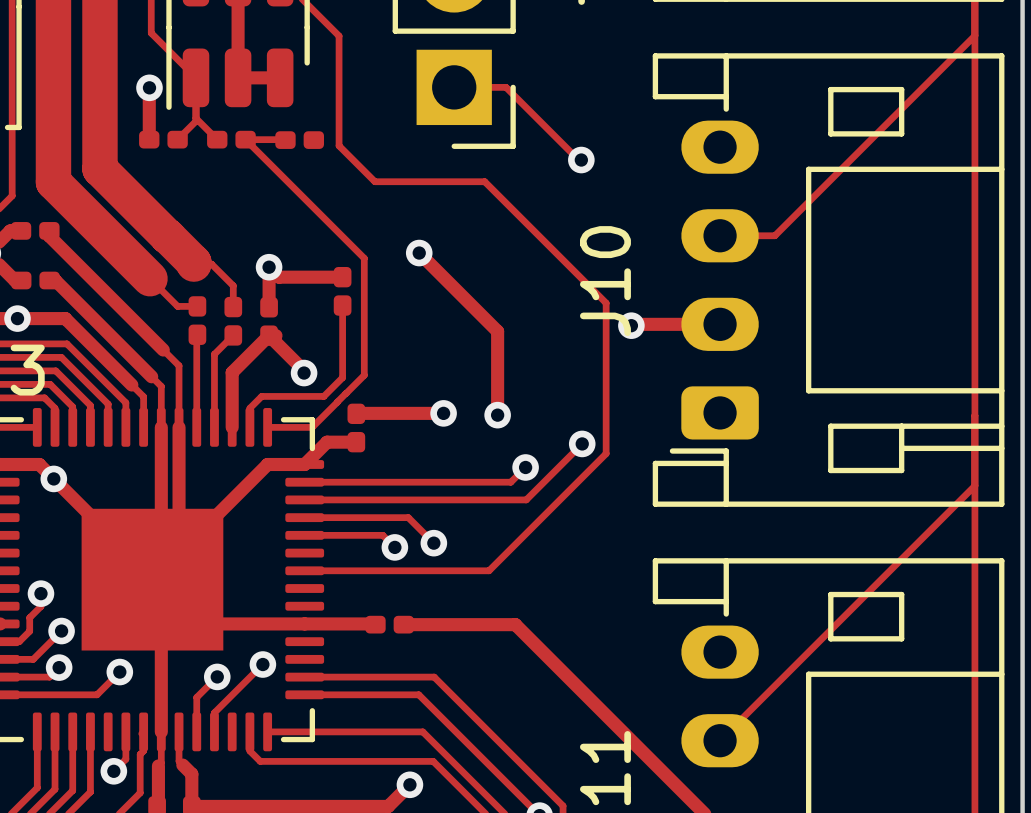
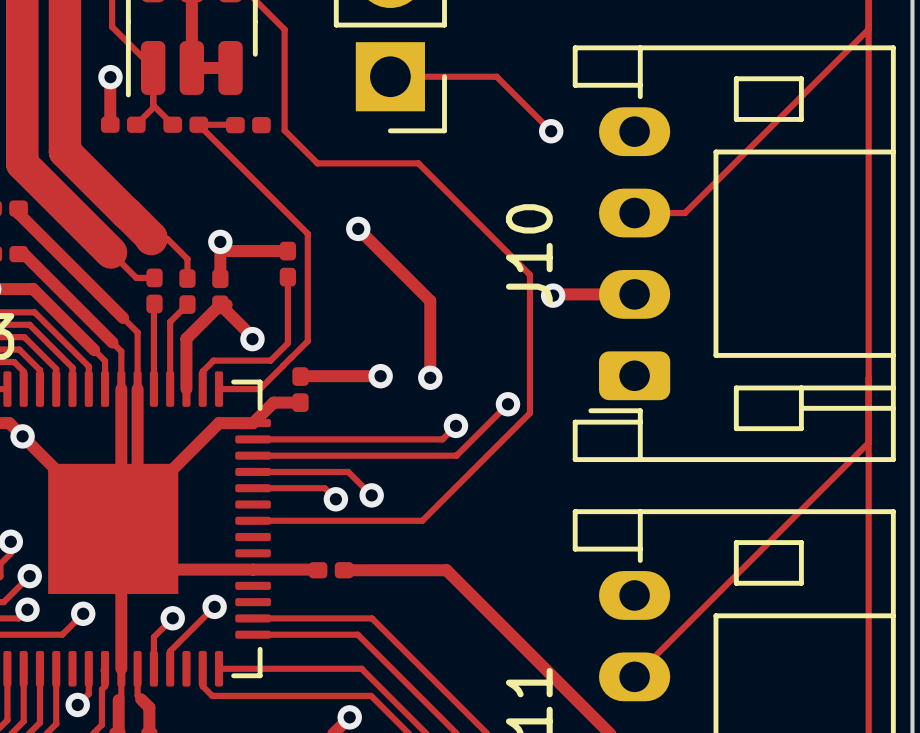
track: (506, 87) (580, 161) -> (438, 76) (496, 76) (551, 131)
via position: (581, 160) -> (551, 131)

